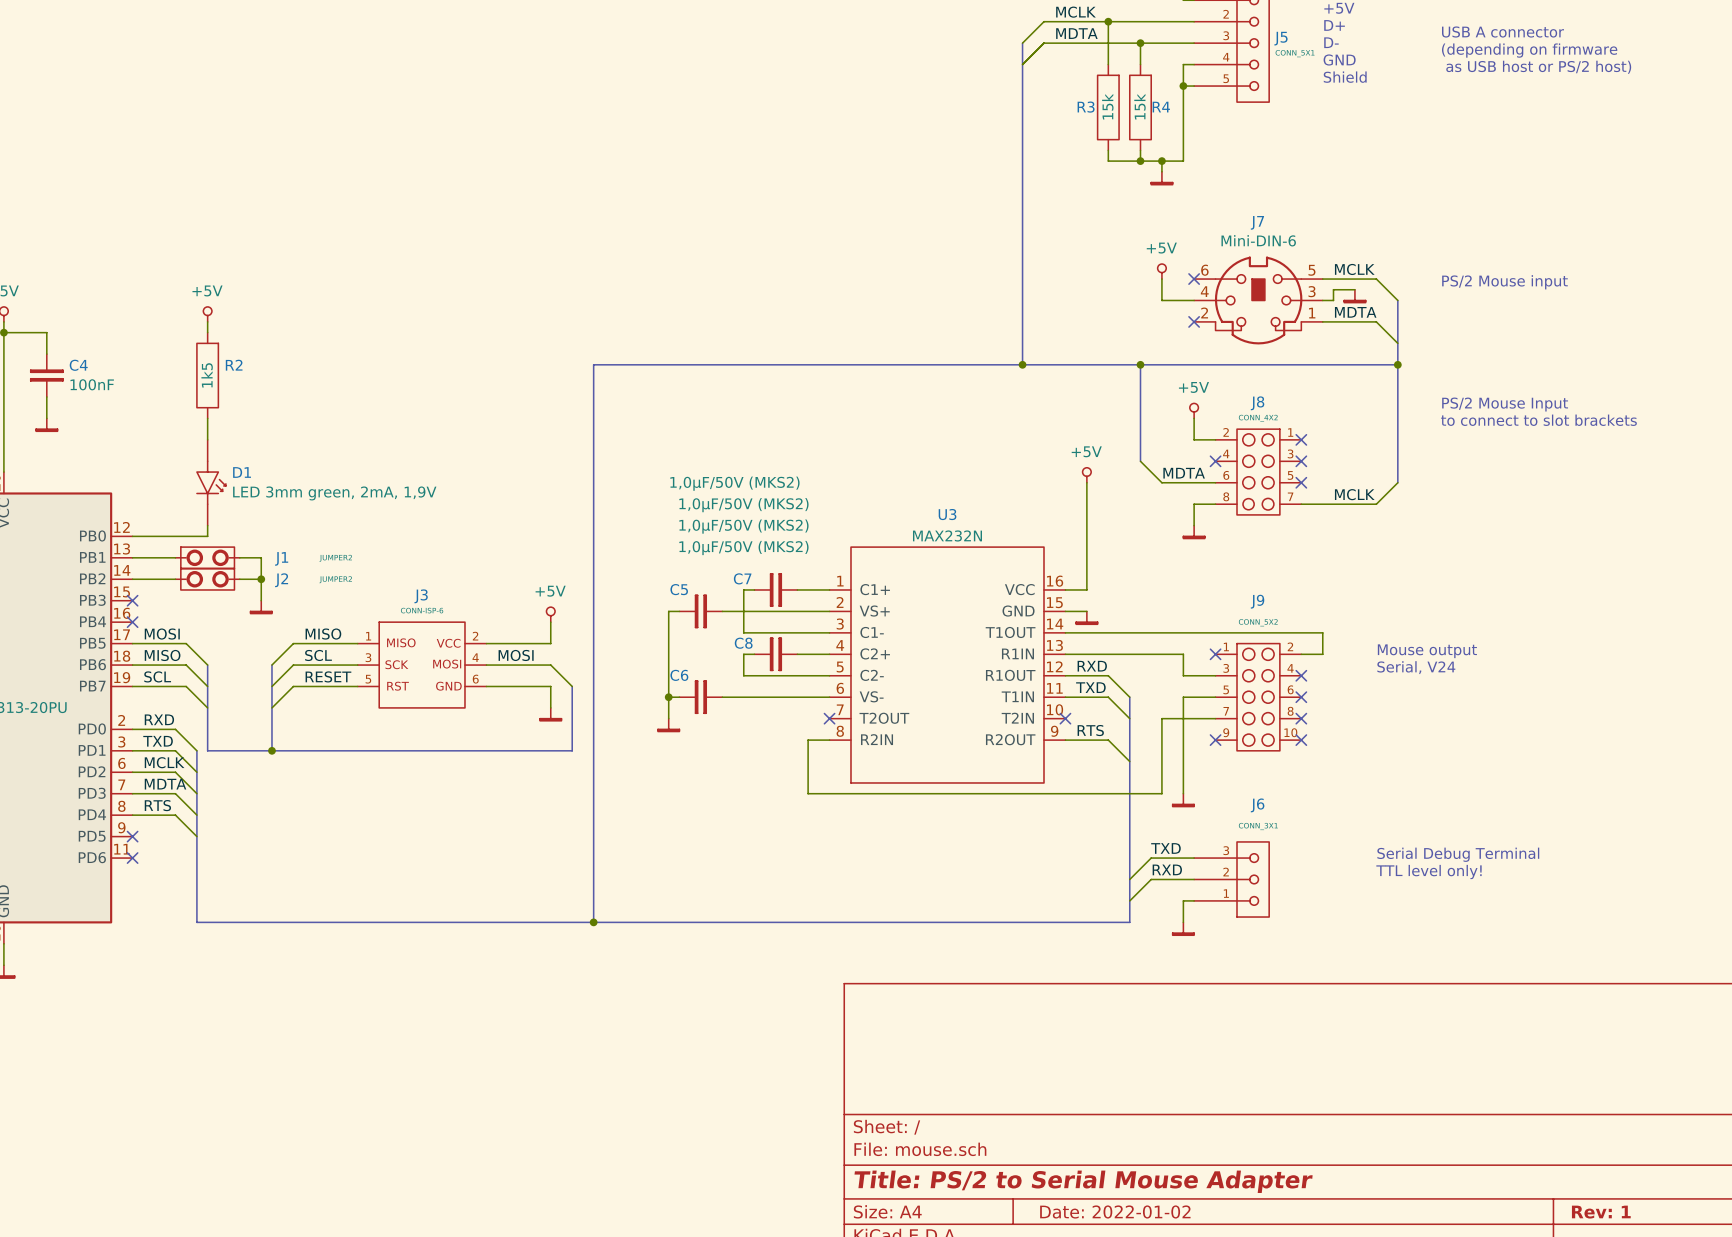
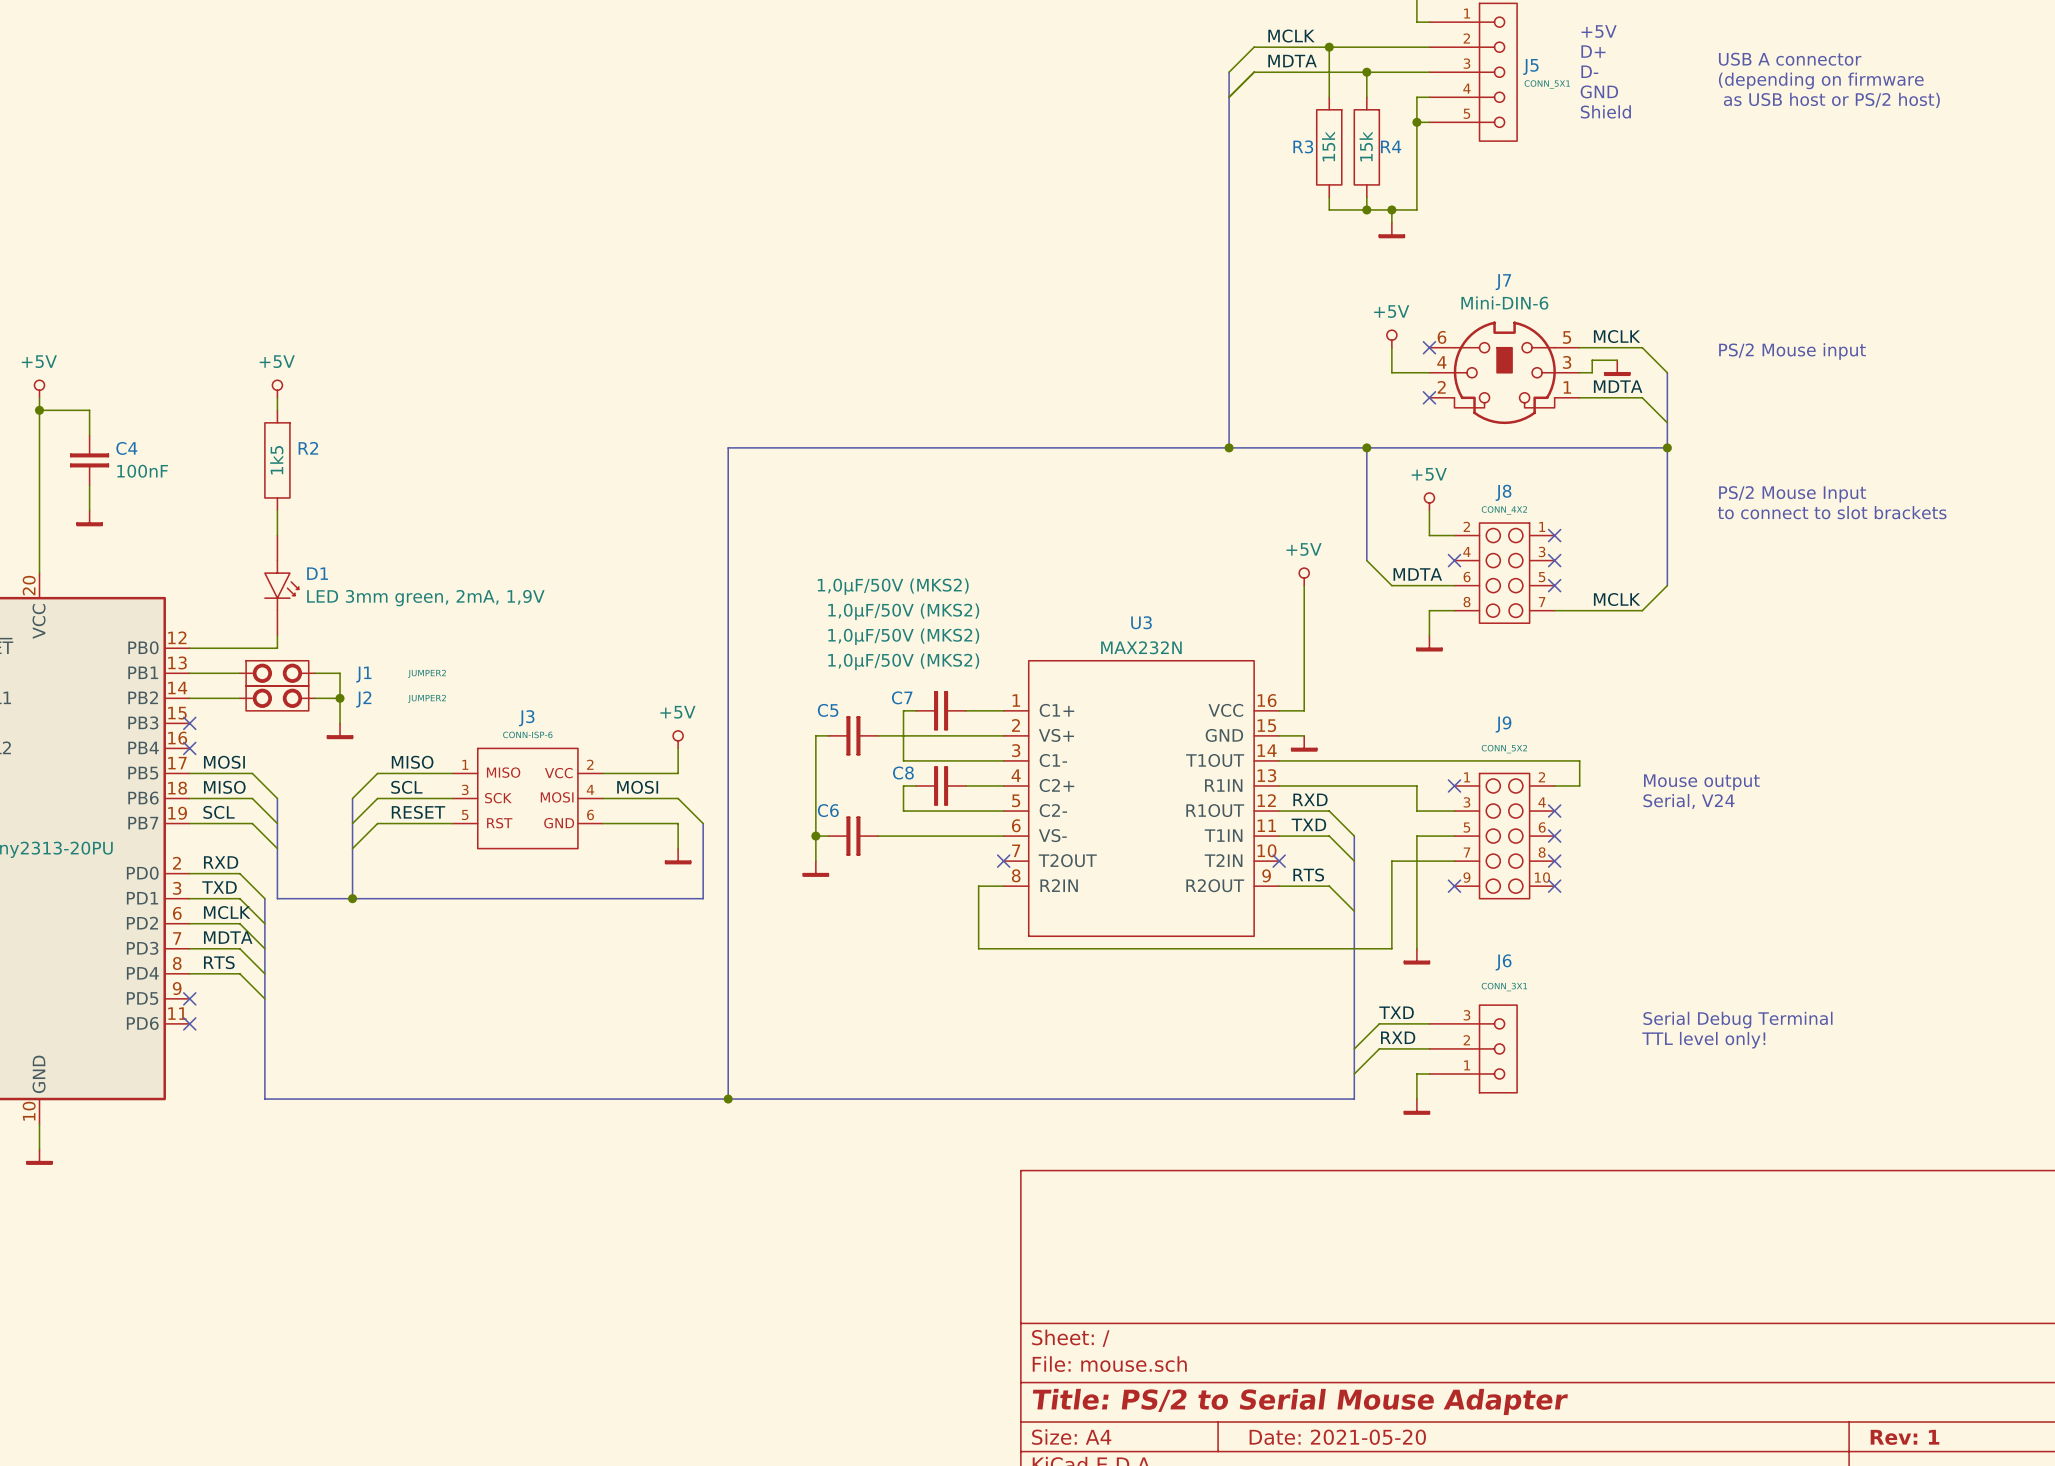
title block: Date: 2022-01-02 (1115, 1211) -> Date: 2021-05-20 (1337, 1437)

